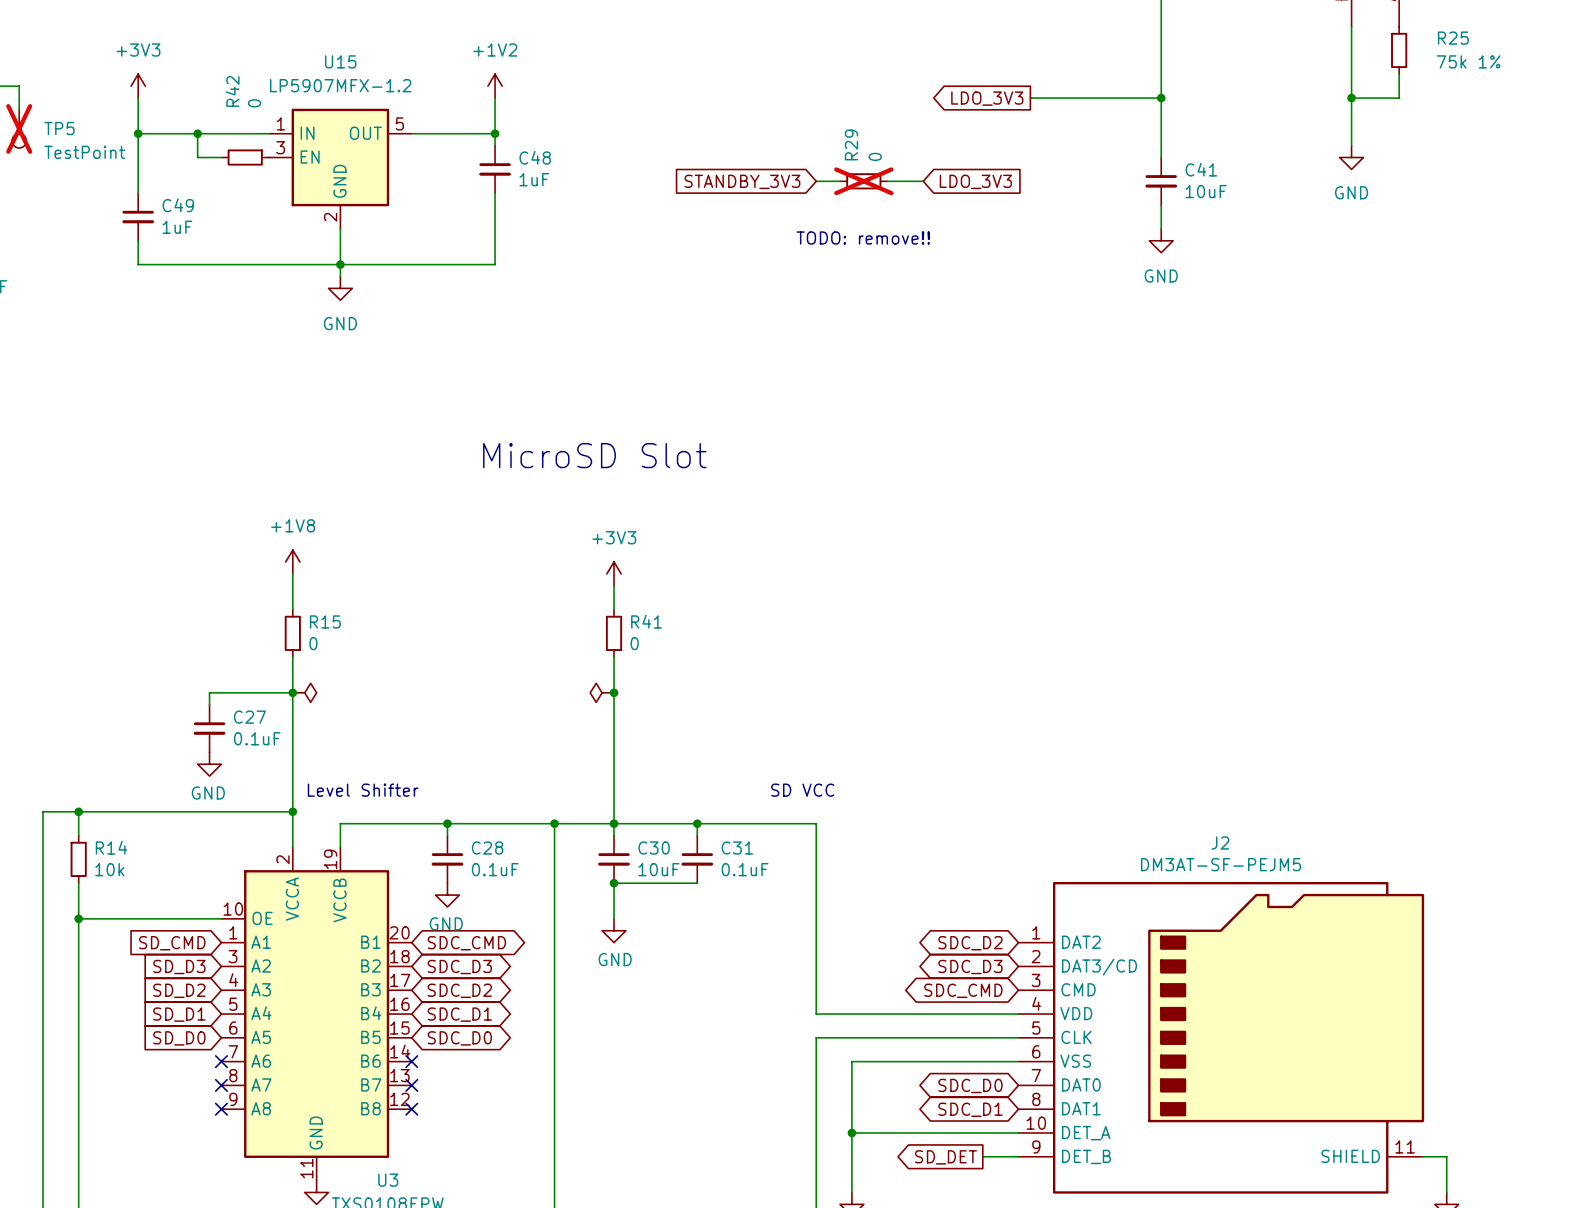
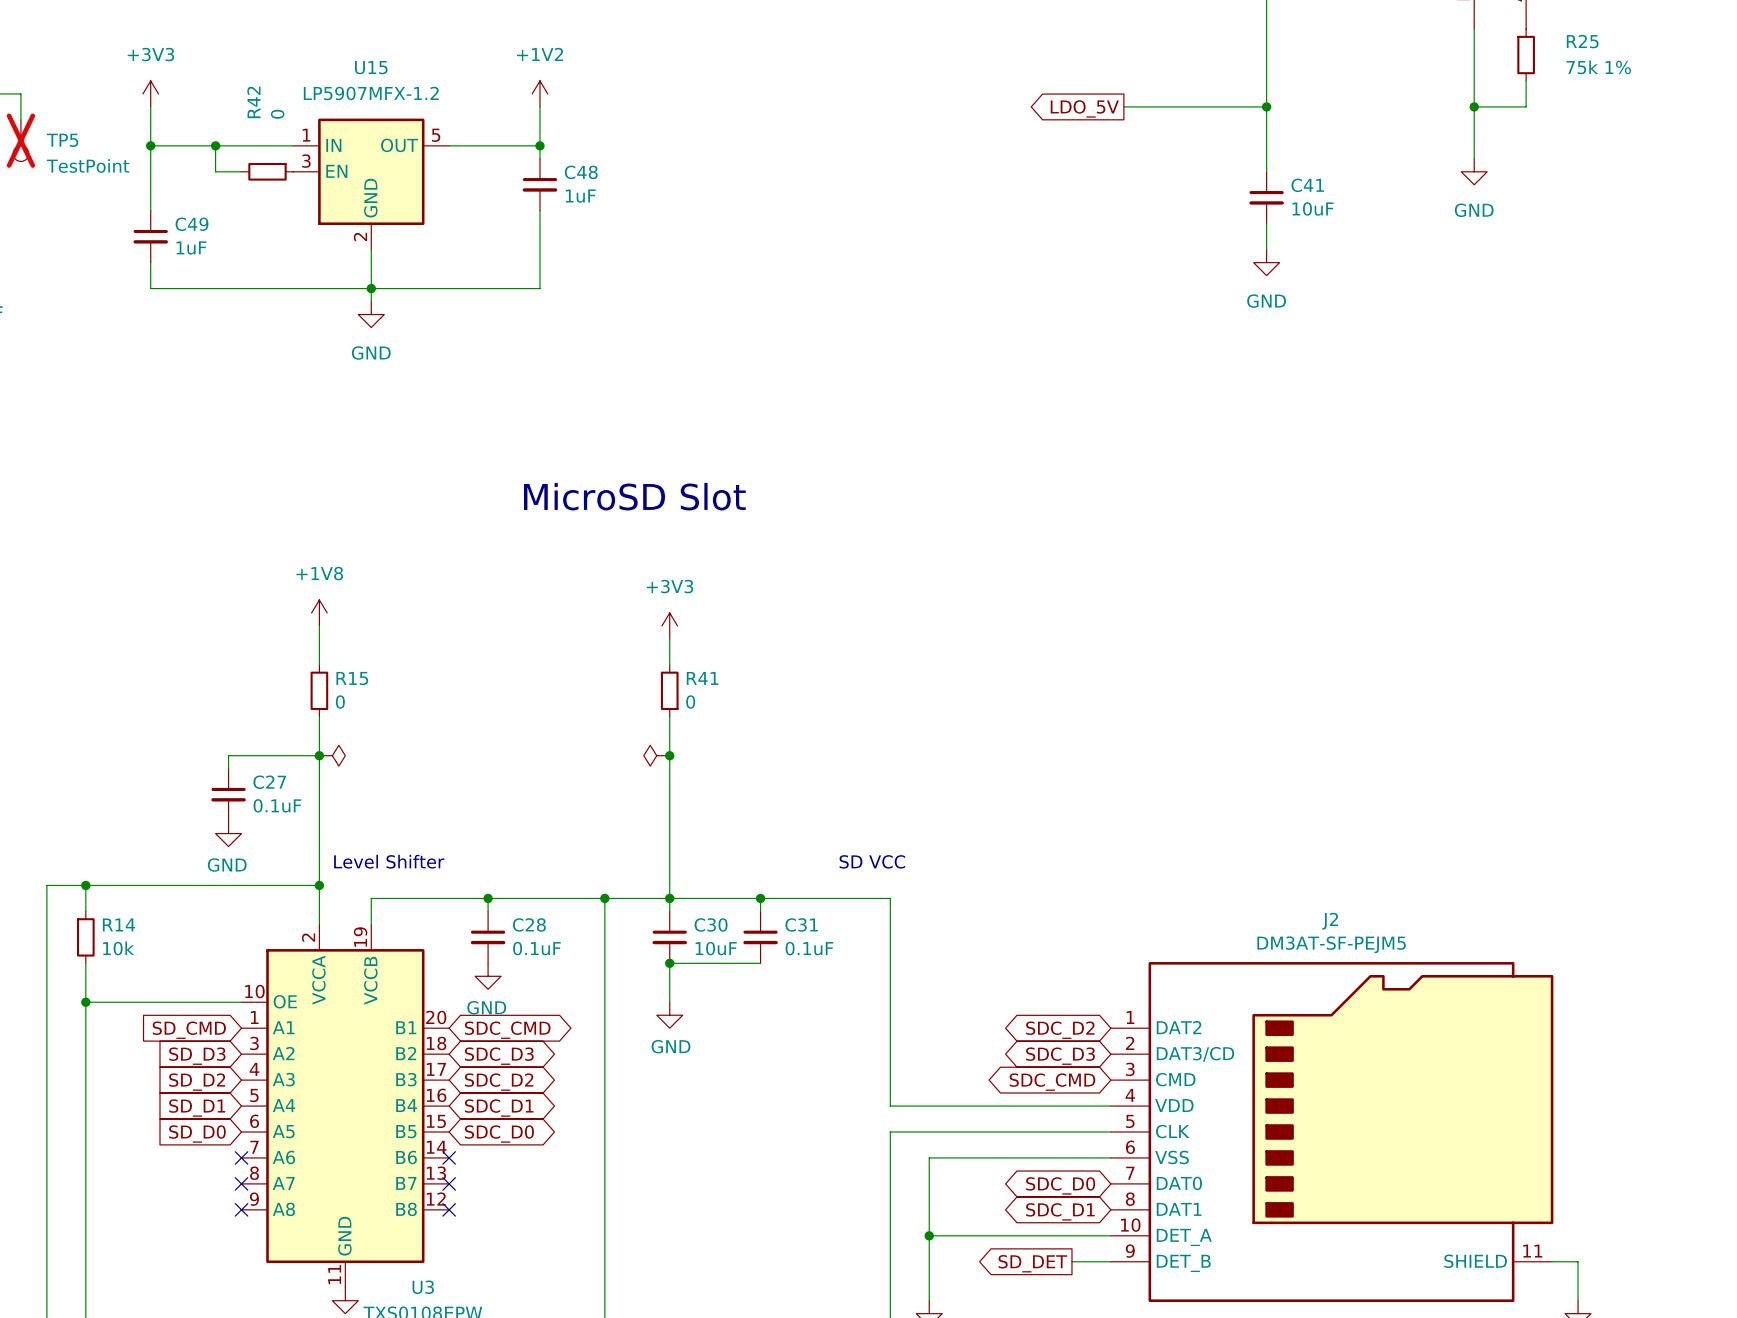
global label: LDO_3V3 (987, 98) -> LDO_5V (1084, 108)
global label: STANDBY_3V3 (742, 181) -> none
wire: (816, 181) (840, 181) -> none
R29: 0 (863, 181) -> none
wire: (887, 181) (923, 181) -> none
global label: LDO_3V3 (975, 181) -> none
text: TODO: remove!! (863, 238) -> none

